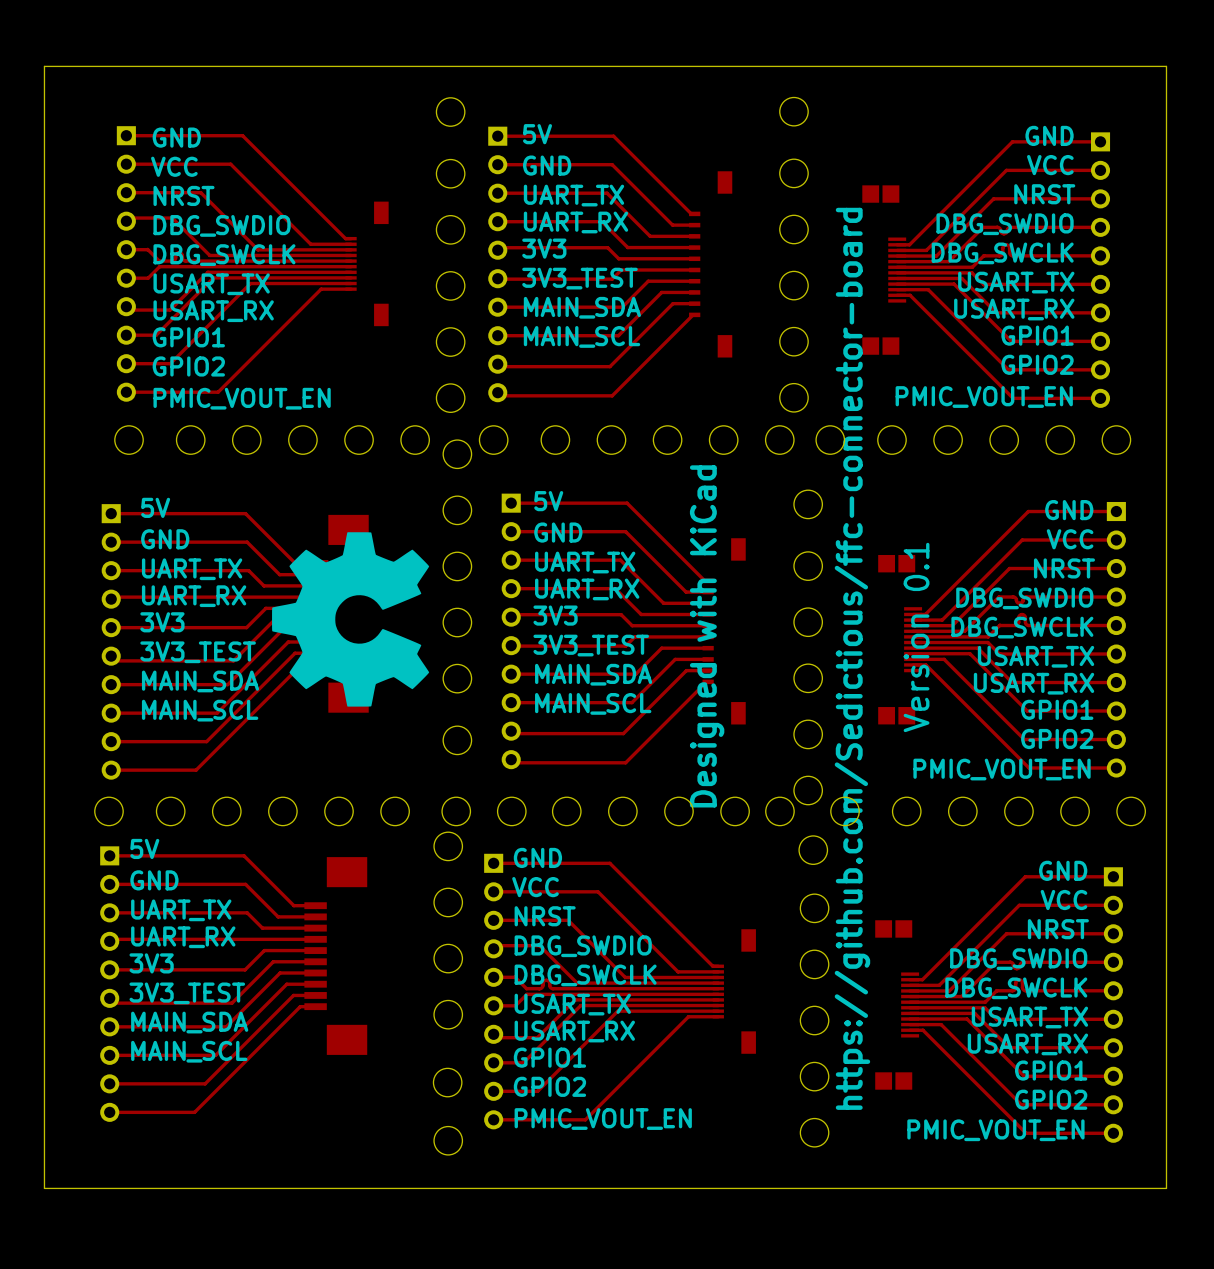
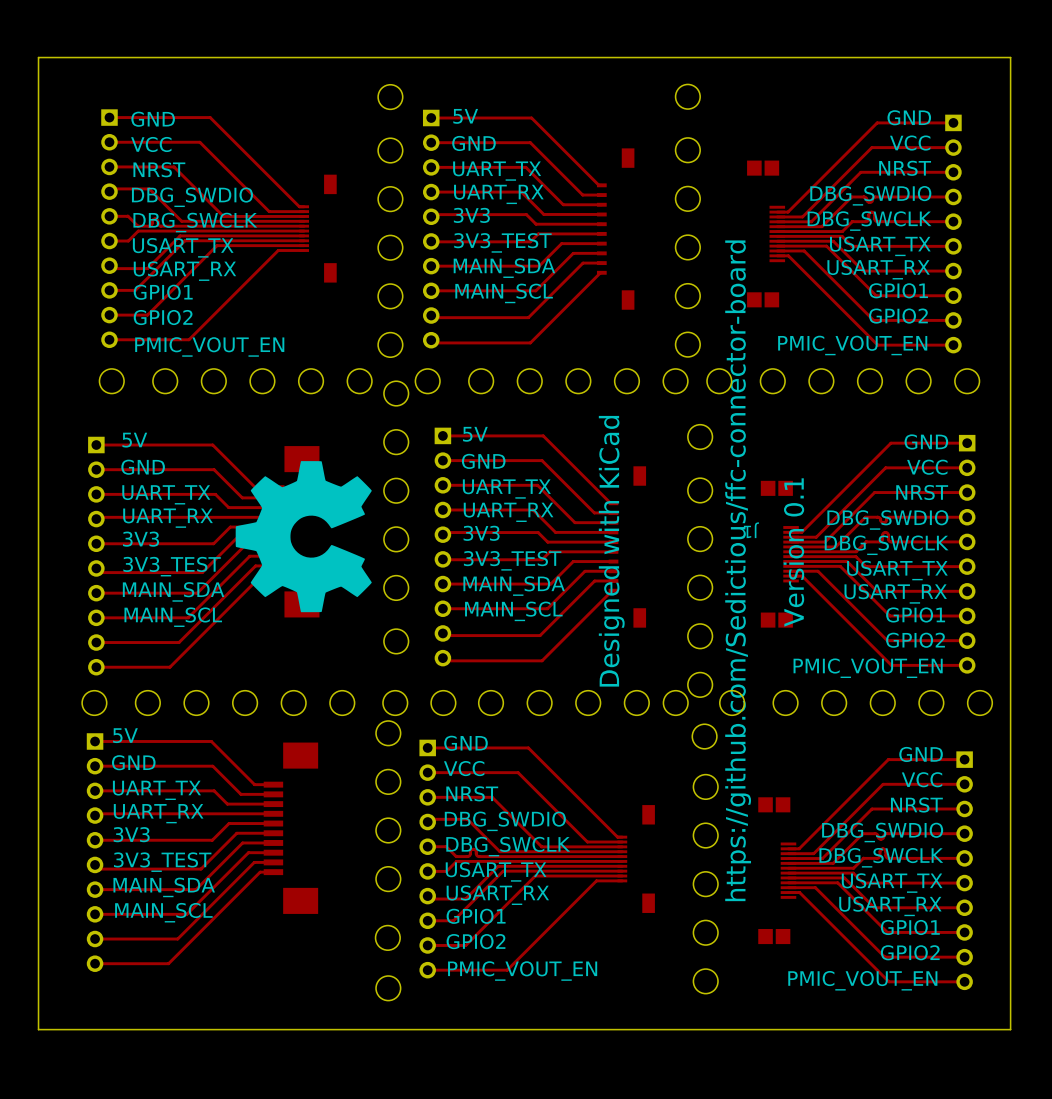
text: none -> J1 (751, 530)

